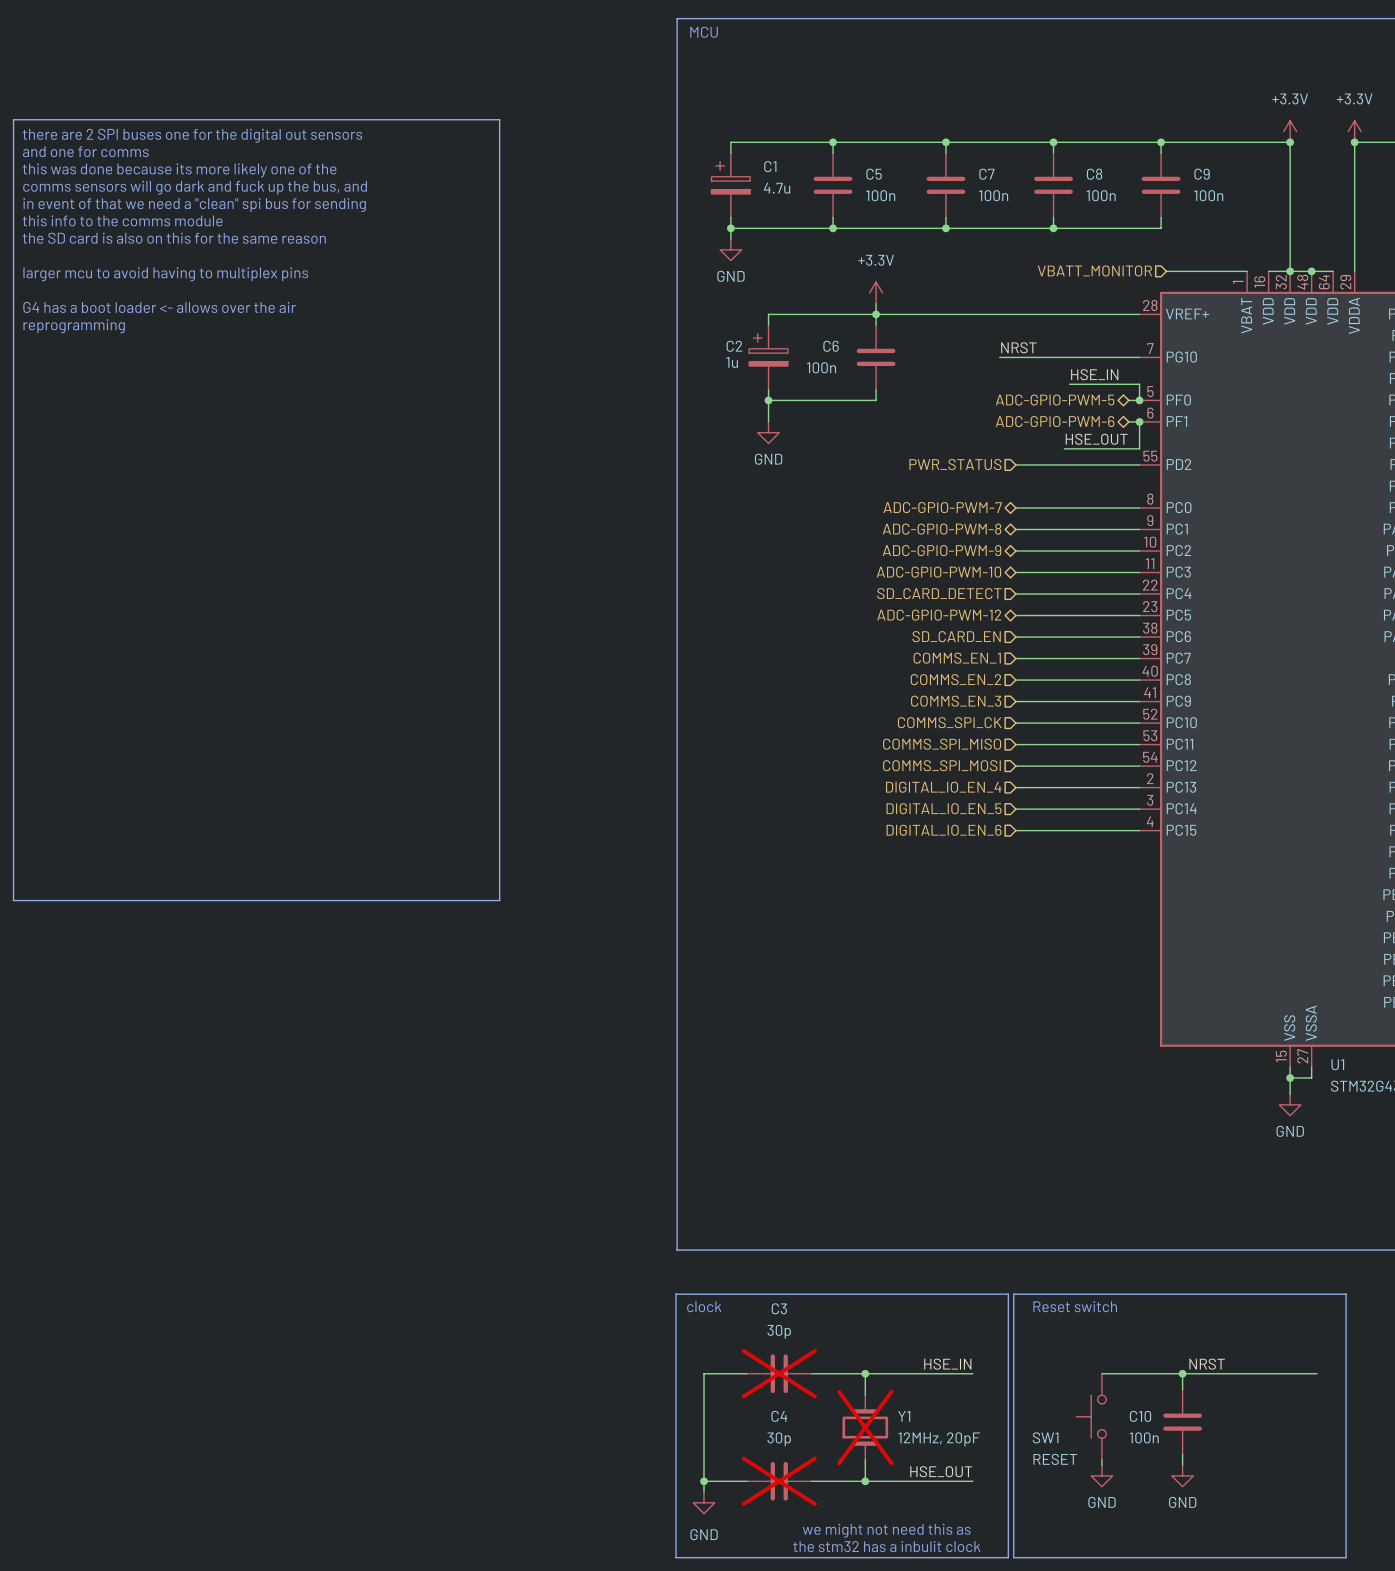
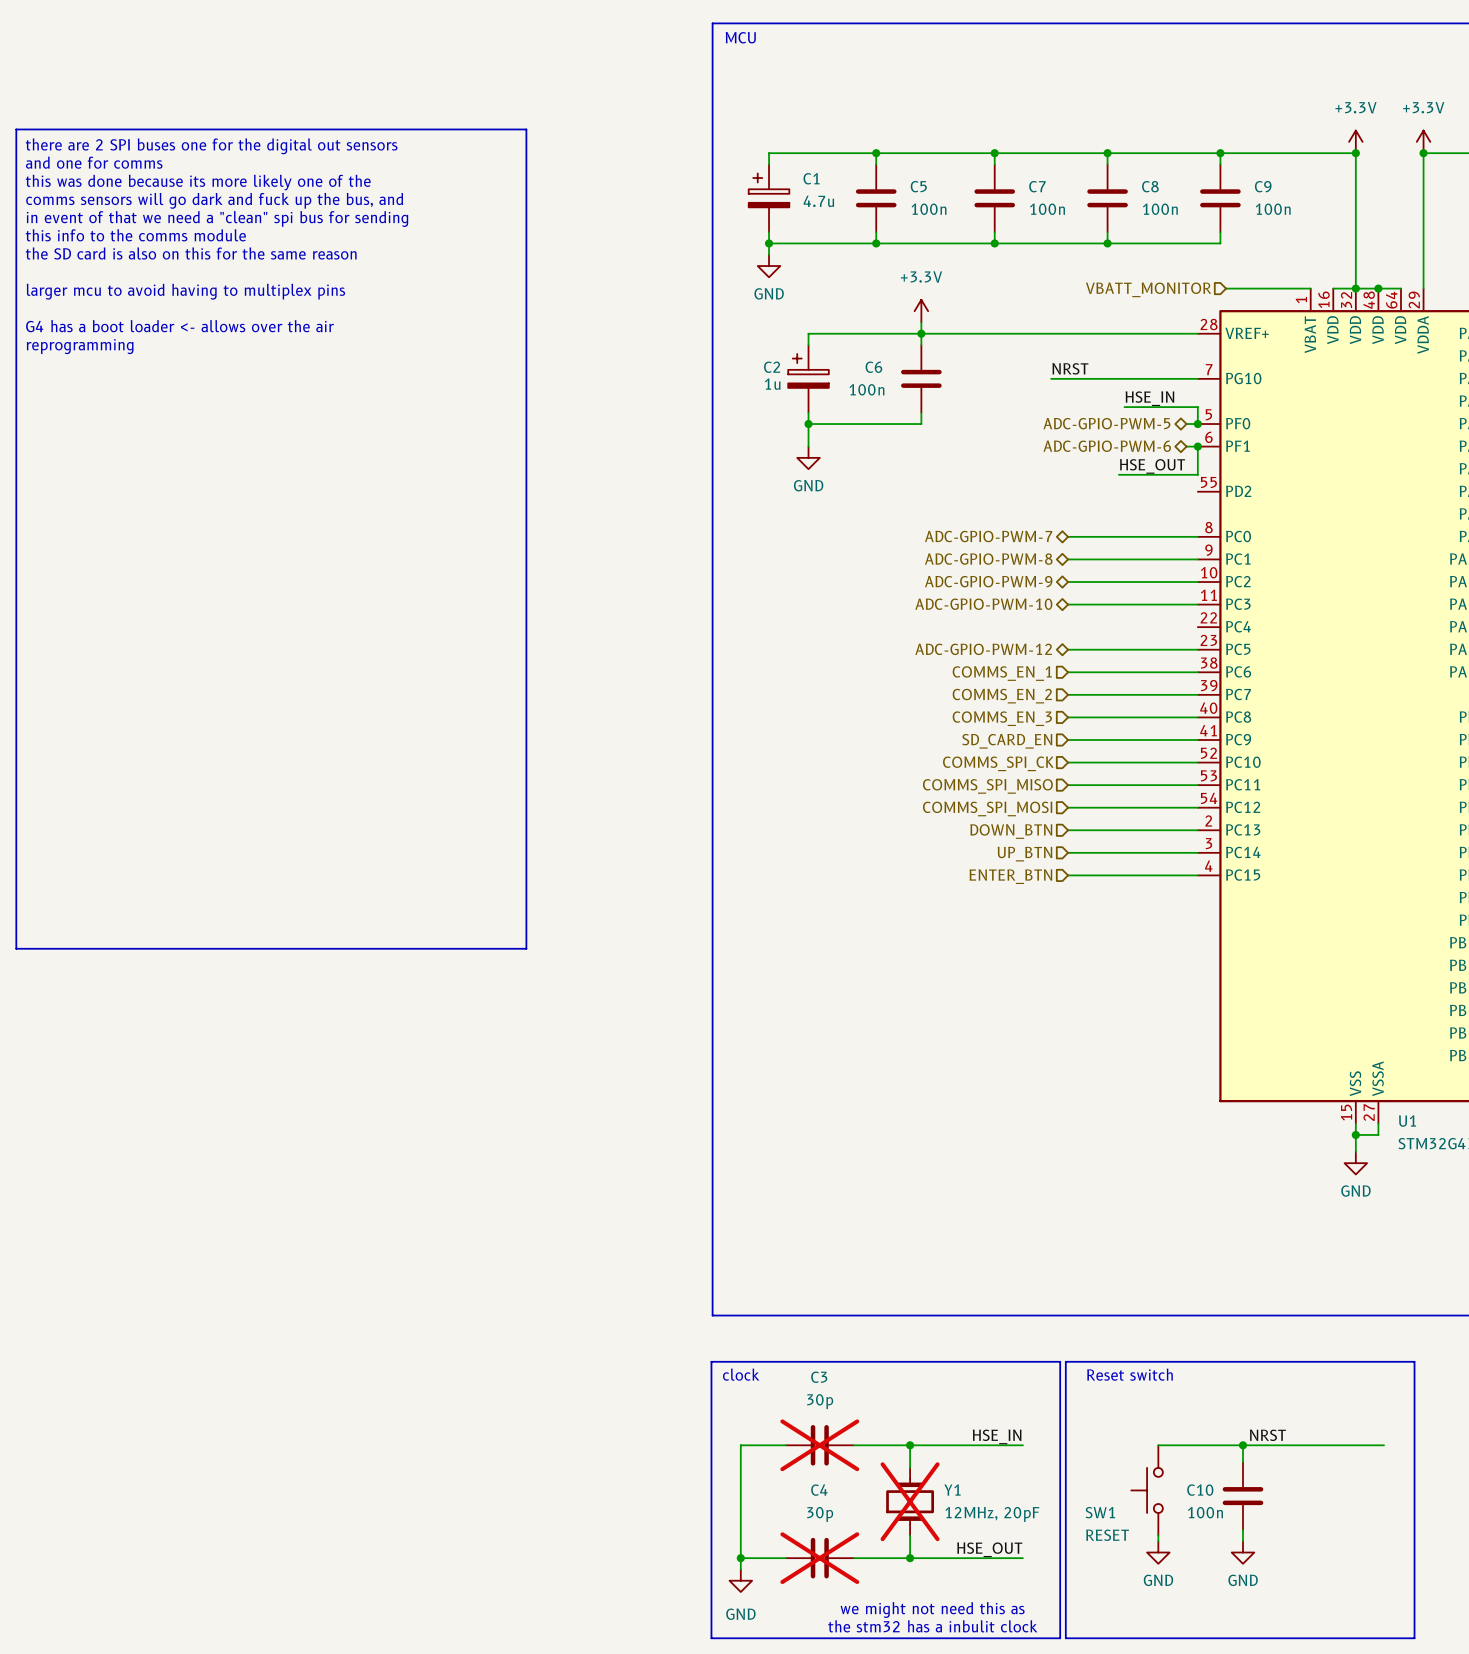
hierarchical label: PWR_STATUS (955, 464) -> none
wire: (1015, 464) (1139, 464) -> none
hierarchical label: SD_CARD_DETECT (939, 593) -> none
wire: (1015, 594) (1139, 594) -> none
hierarchical label: SD_CARD_EN (956, 636) -> COMMS_EN_1 (1002, 673)
hierarchical label: COMMS_EN_1 (957, 658) -> COMMS_EN_2 (1002, 696)
hierarchical label: COMMS_EN_2 (956, 679) -> COMMS_EN_3 (1002, 718)
hierarchical label: COMMS_EN_3 (956, 701) -> SD_CARD_EN (1007, 741)
hierarchical label: DIGITAL_IO_EN_4 (943, 787) -> DOWN_BTN (1011, 831)
hierarchical label: DIGITAL_IO_EN_5 (944, 808) -> UP_BTN (1024, 854)
hierarchical label: DIGITAL_IO_EN_6 (944, 830) -> ENTER_BTN (1010, 876)

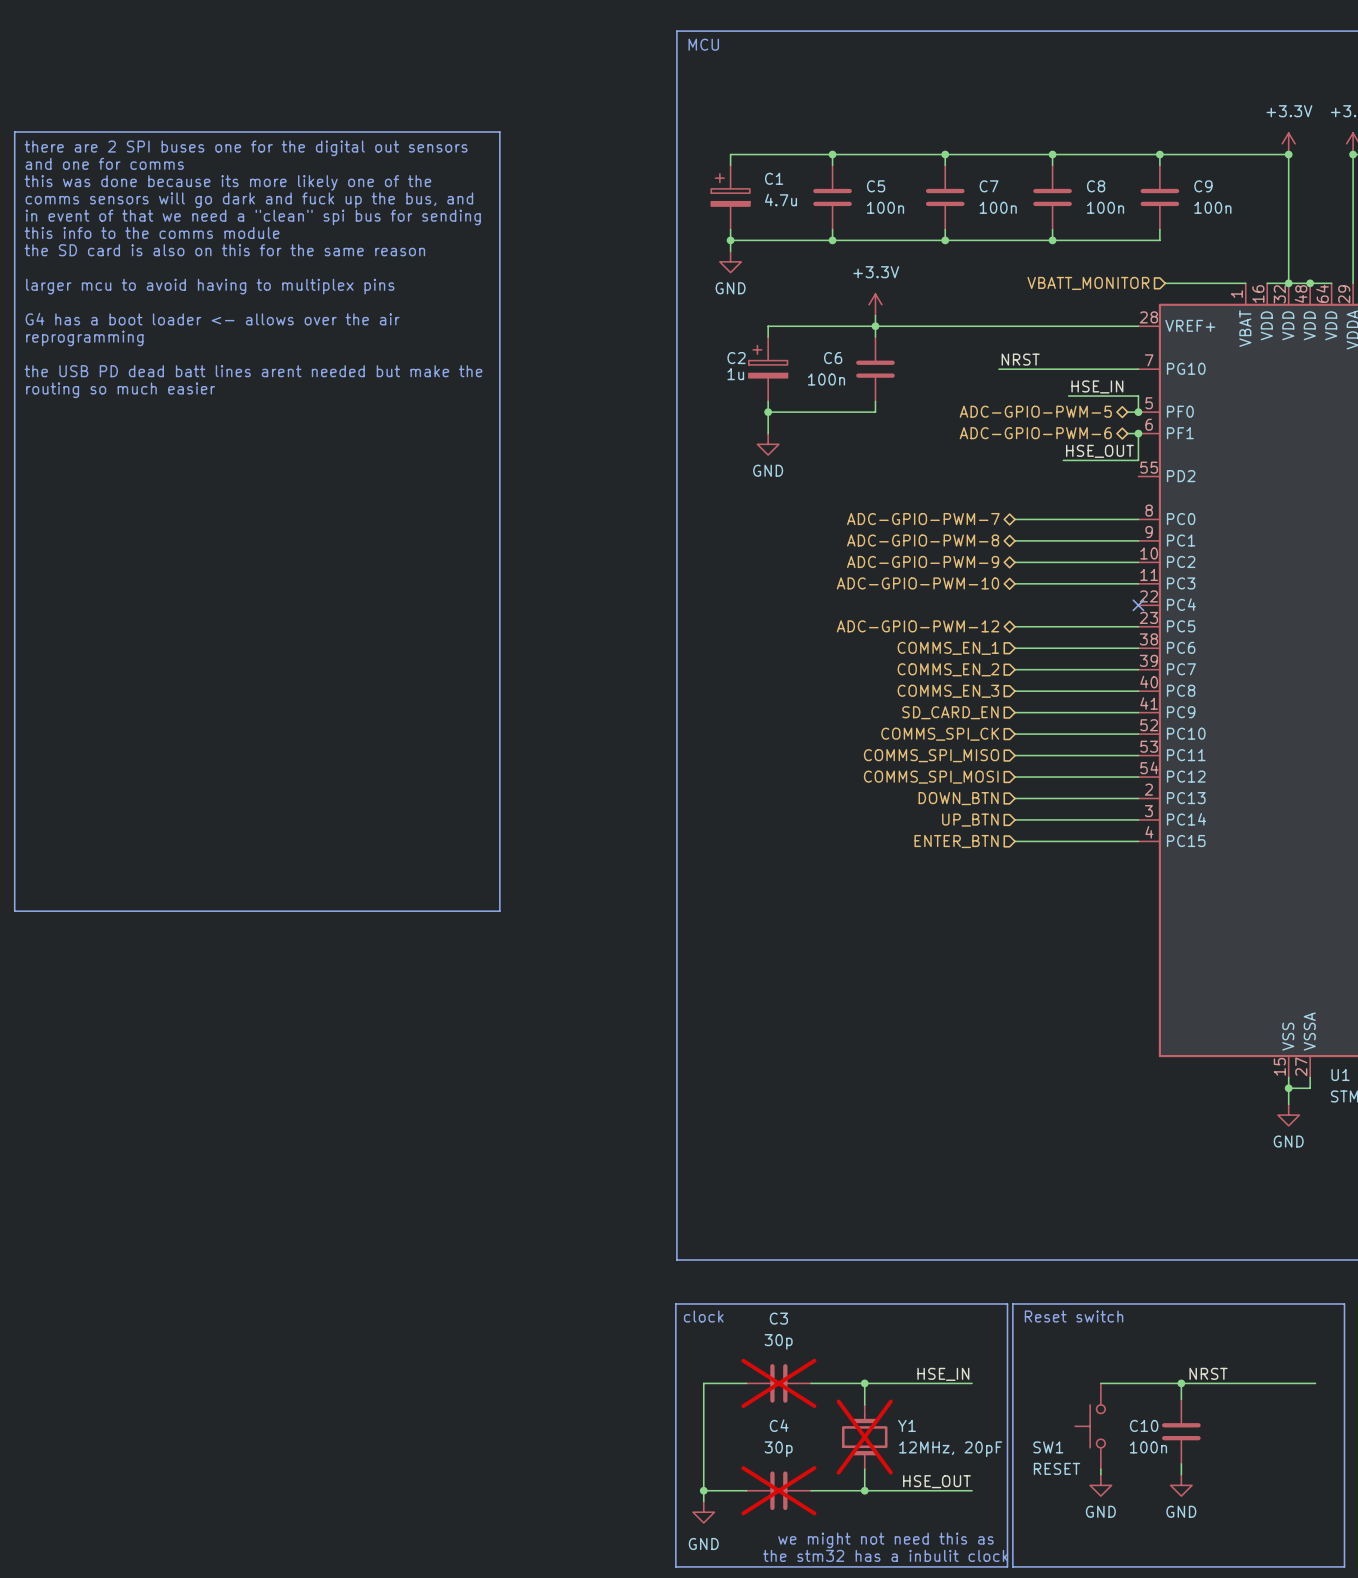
text: none -> the USB PD dead batt lines arent needed but make the (253, 371)
text: none -> routing so much easier (120, 390)
no-connect mark: none -> (1138, 605)

